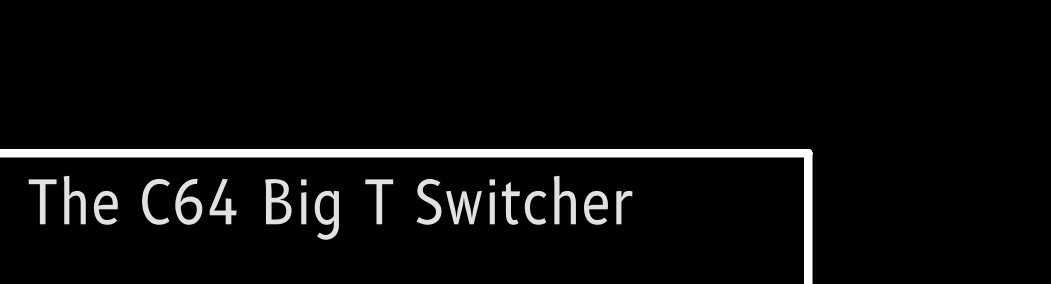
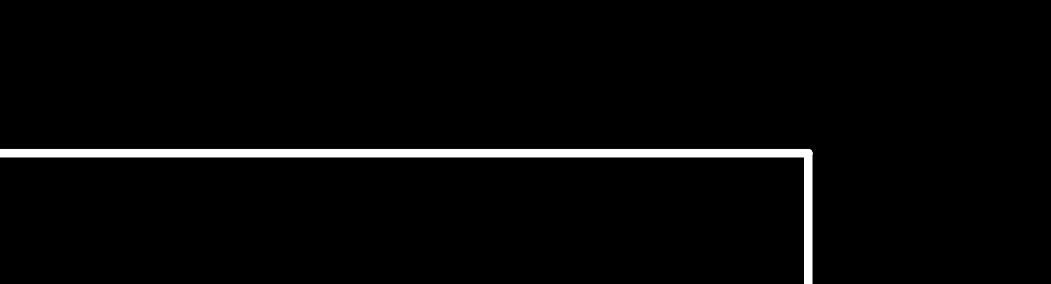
text: The C64 Big T Switcher (330, 207) -> none

